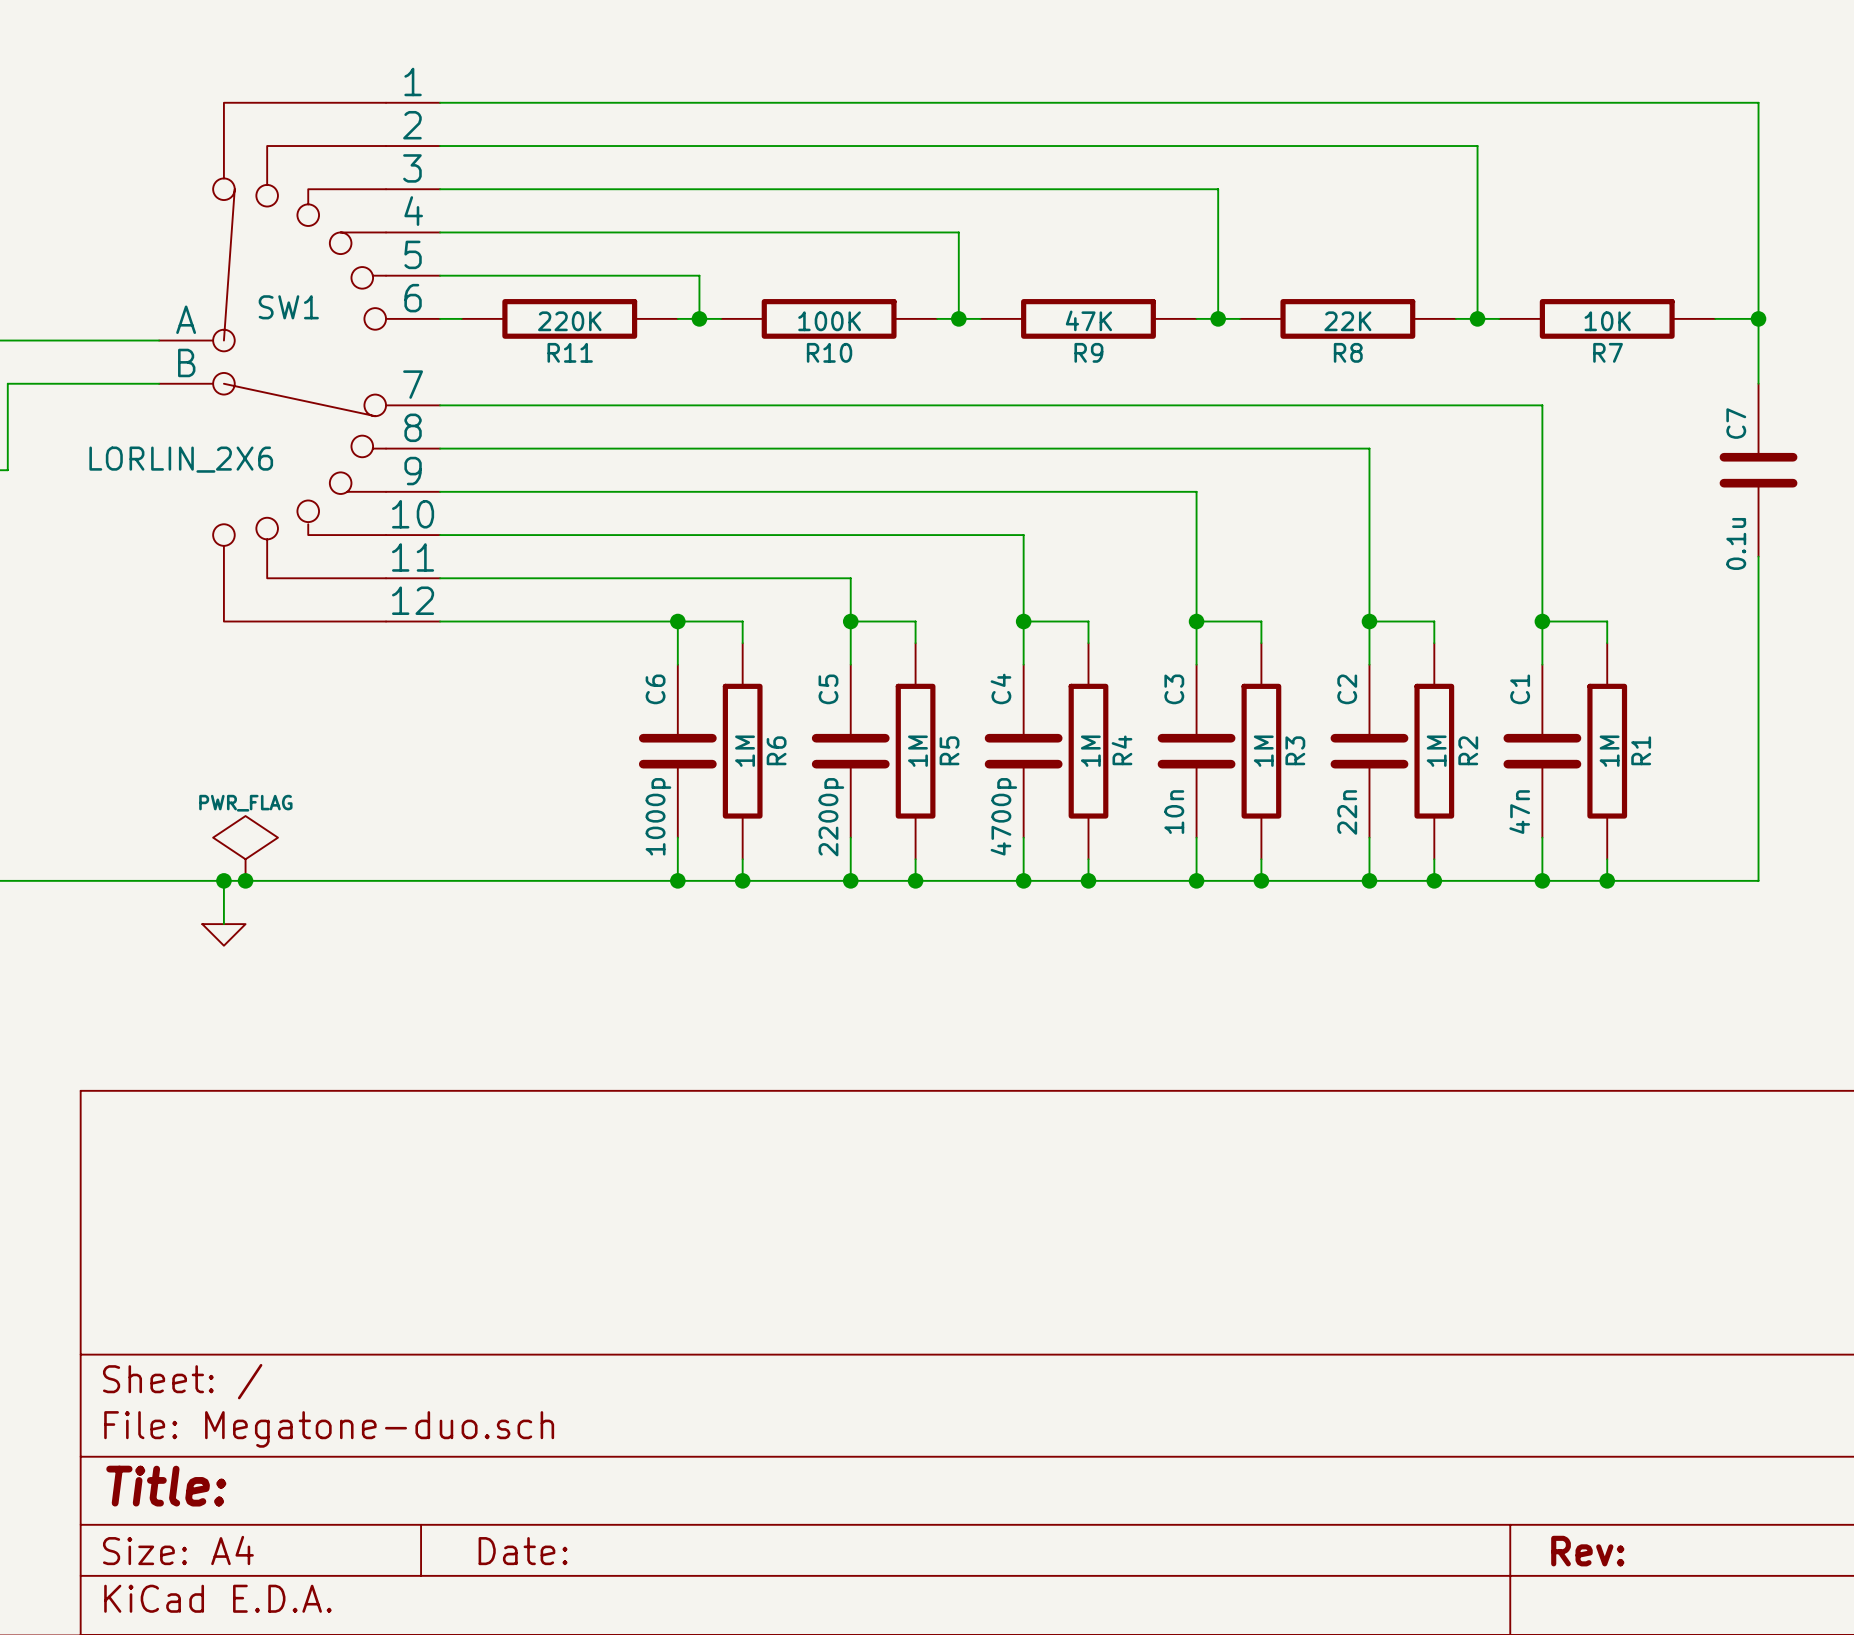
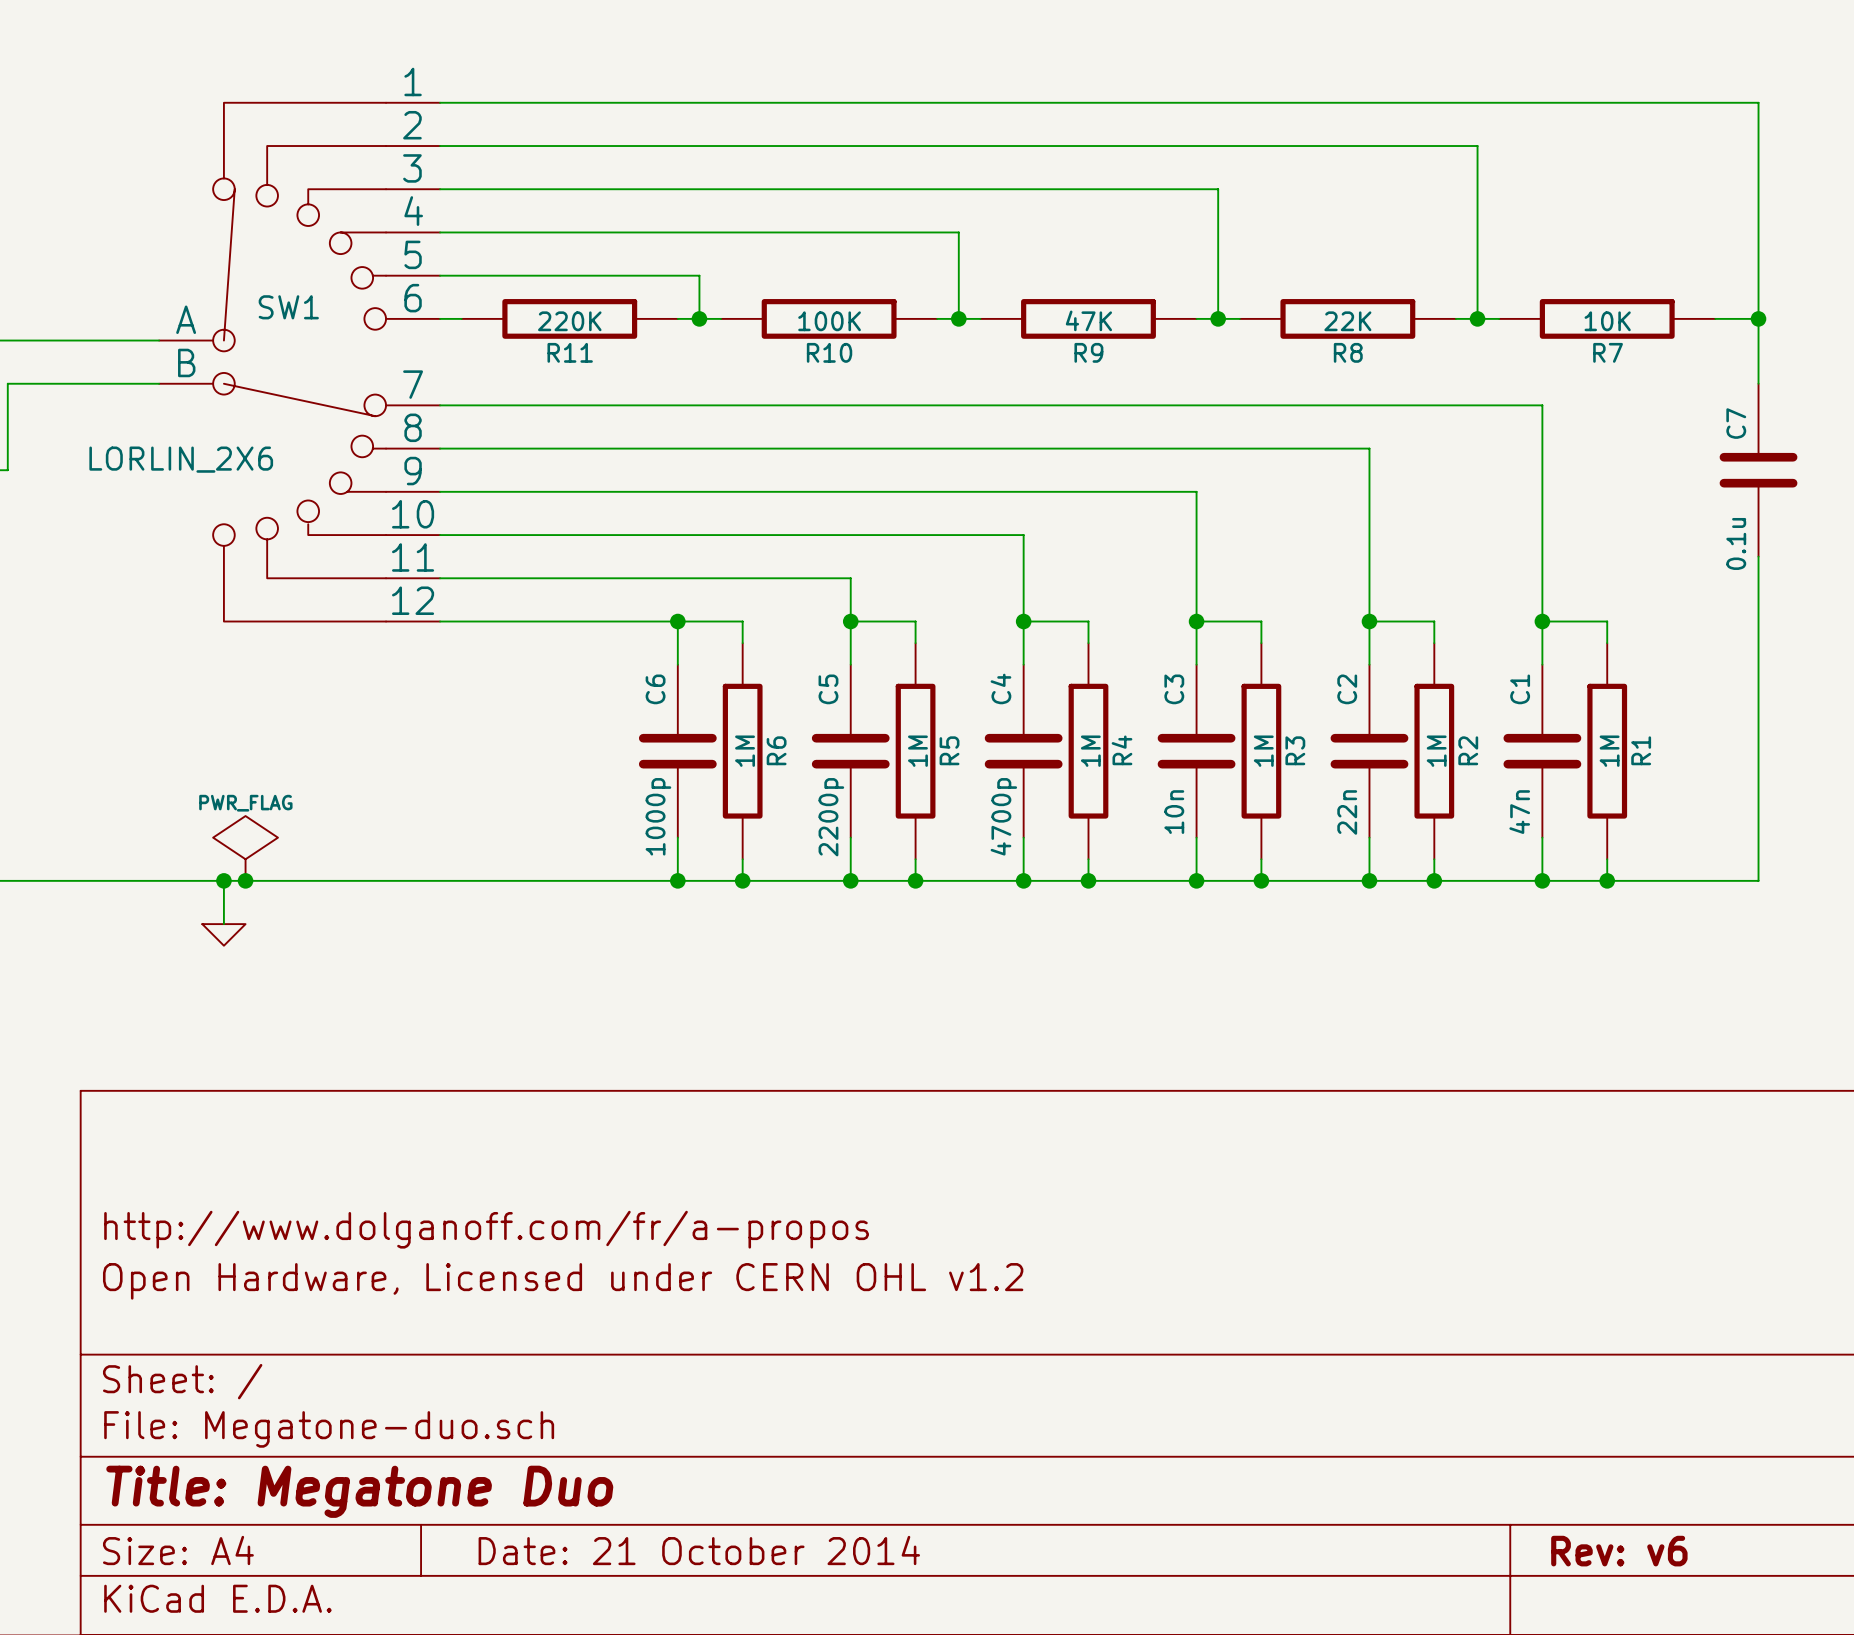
title block: none -> http://www.dolganoff.com/fr/a-propos (486, 1229)
title block: none -> Open Hardware, Licensed under CERN OHL v1.2 (563, 1281)
title block: Title: (166, 1486) -> Title: Megatone Duo (359, 1491)
title block: Date: (523, 1551) -> Date: 21 October 2014 (699, 1550)
title block: Rev: (1587, 1551) -> Rev: v6 (1619, 1551)

